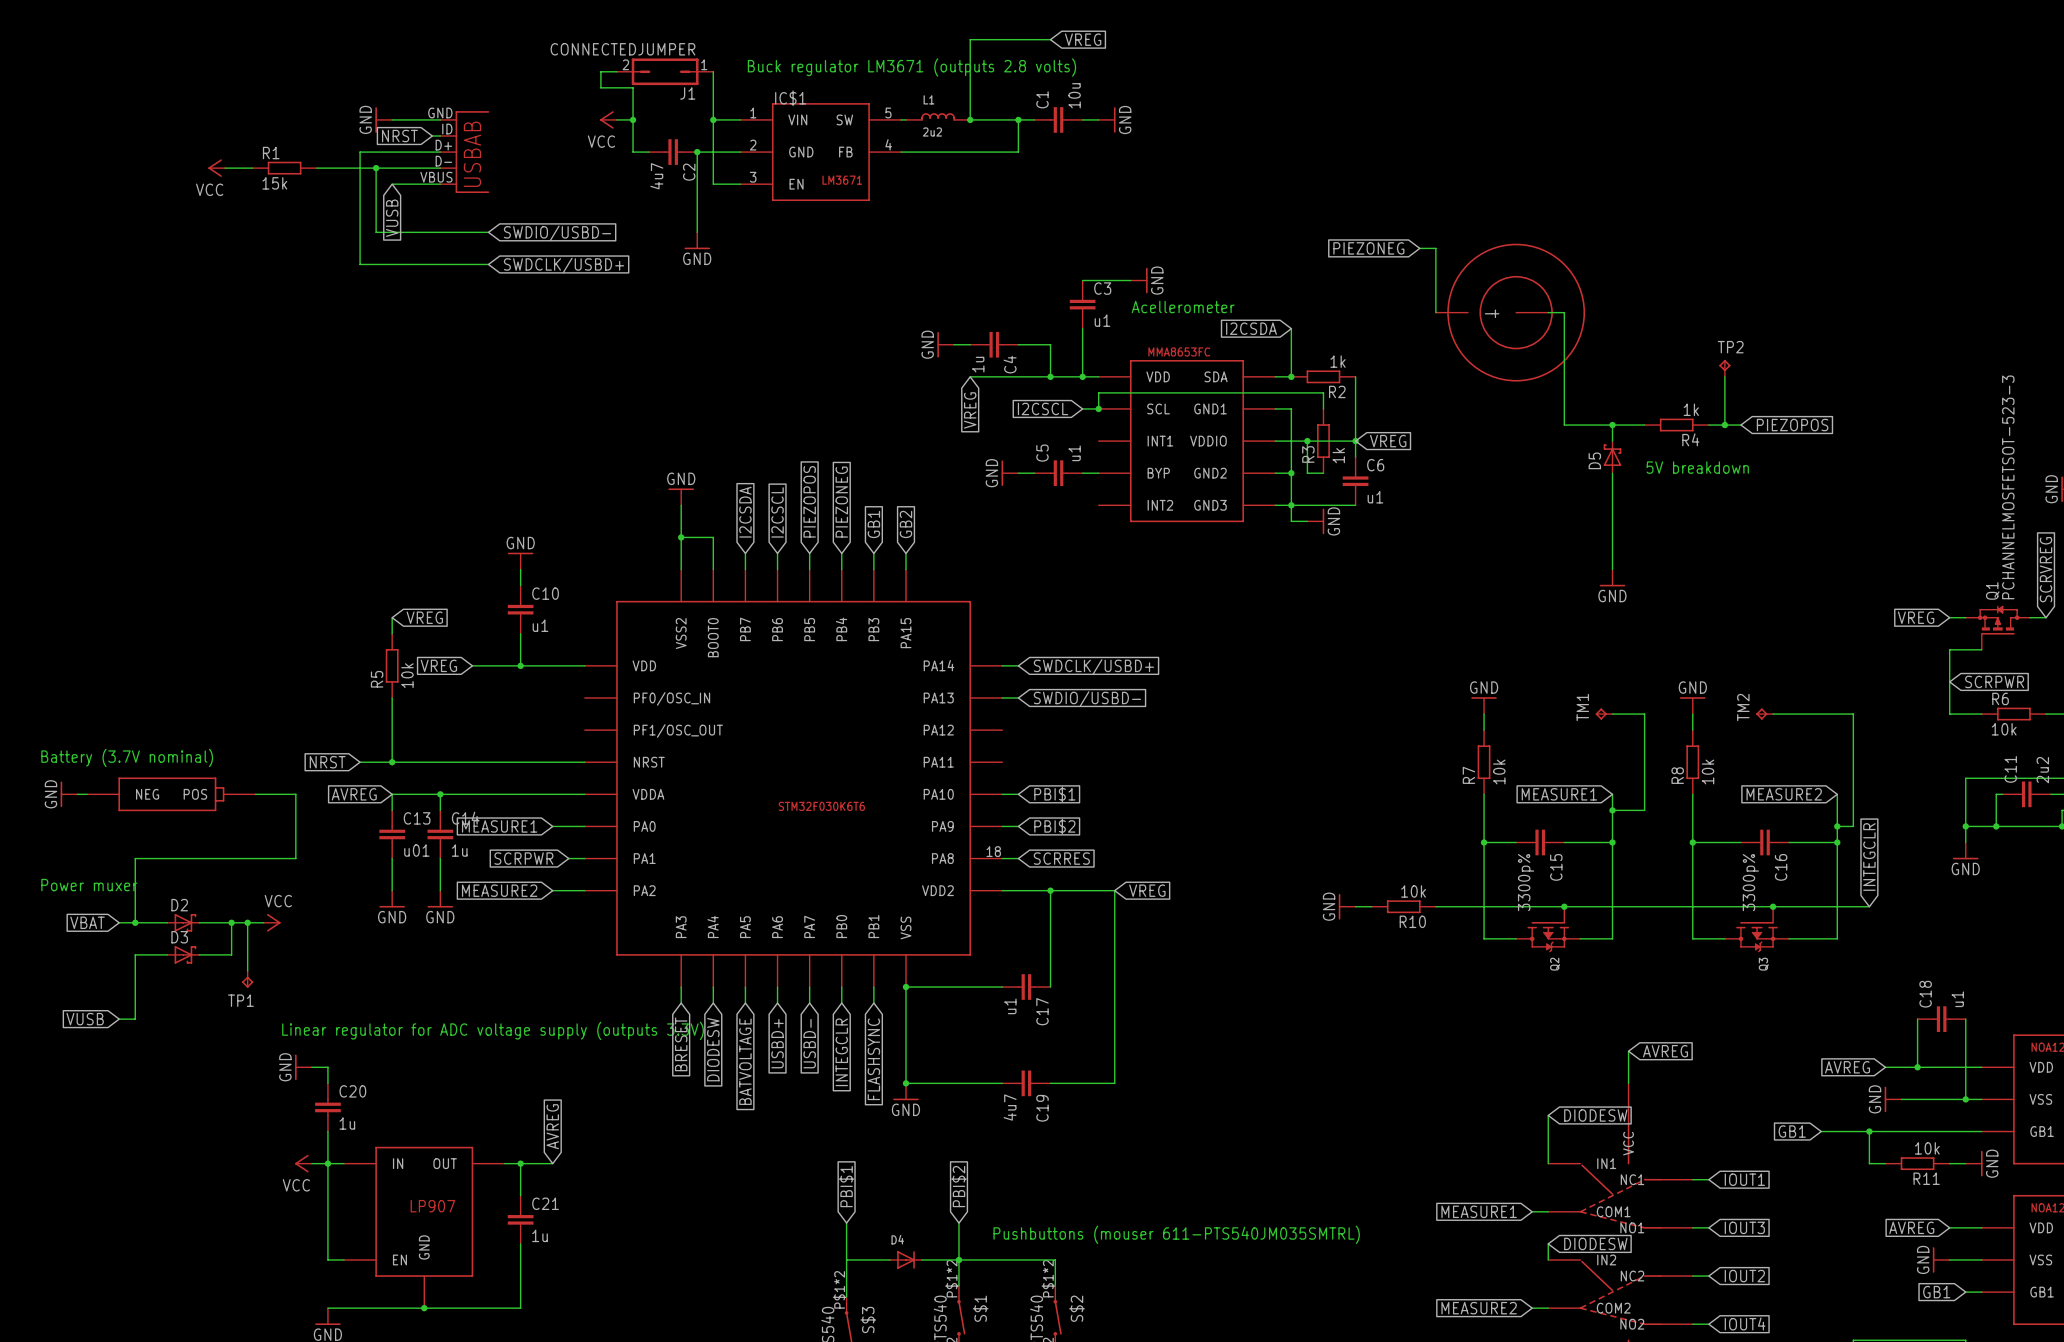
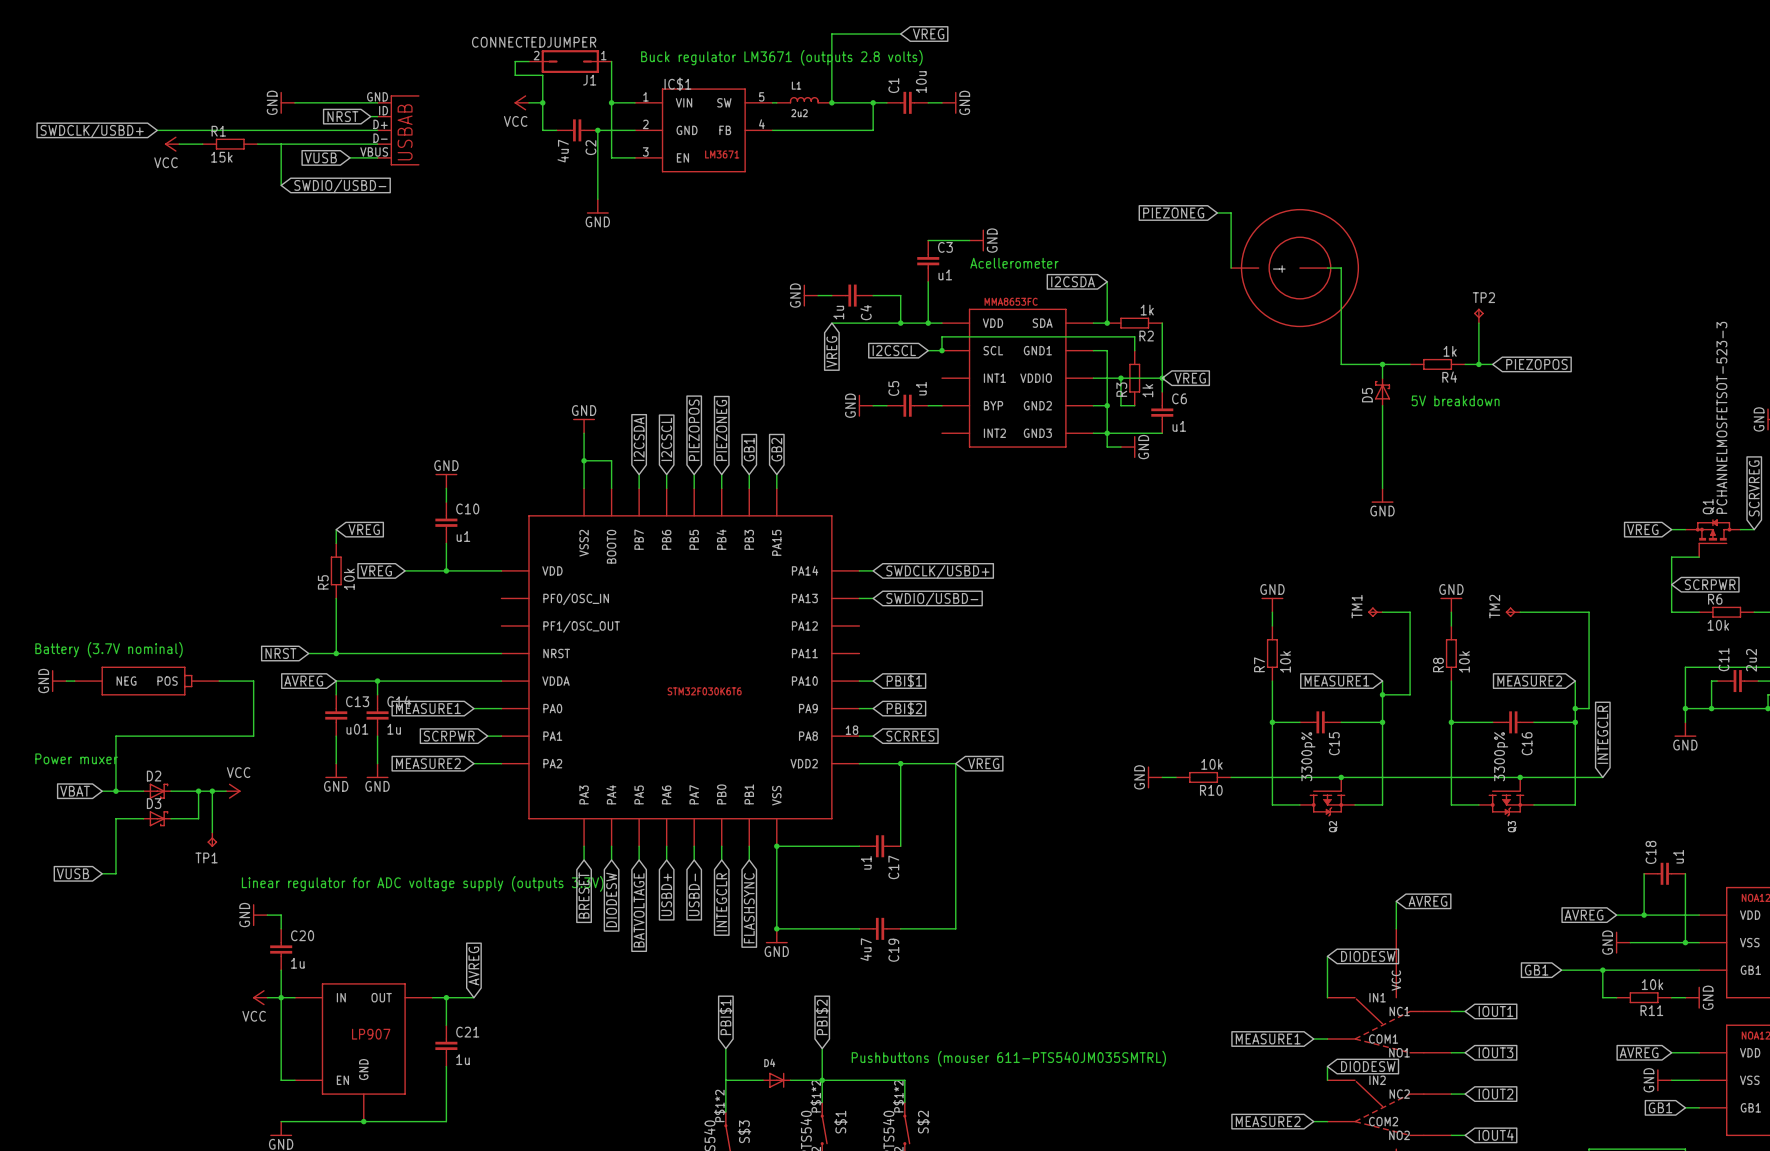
wire: none -> (294, 102) (336, 102)
power symbol position: GND (383, 119) -> GND (287, 102)
wire: (360, 152) (360, 264) (488, 264) -> (308, 130) (157, 130)
global label: none -> SWDCLK/USBD+ (92, 131)
power symbol position: VCC (216, 168) -> VCC (172, 144)
R1 position: (284, 168) -> (230, 144)
wire: none -> (281, 144) (281, 185)
wire: (376, 168) (376, 232) (488, 232) -> none
junction: (376, 168) -> none
global label: none -> SWDIO/USBD- (340, 186)
global label rotation: 0° (392, 218) -> 90° clockwise (320, 157)
global label: SWDIO/USBD- (557, 233) -> none
global label: SWDCLK/USBD+ (564, 265) -> none

